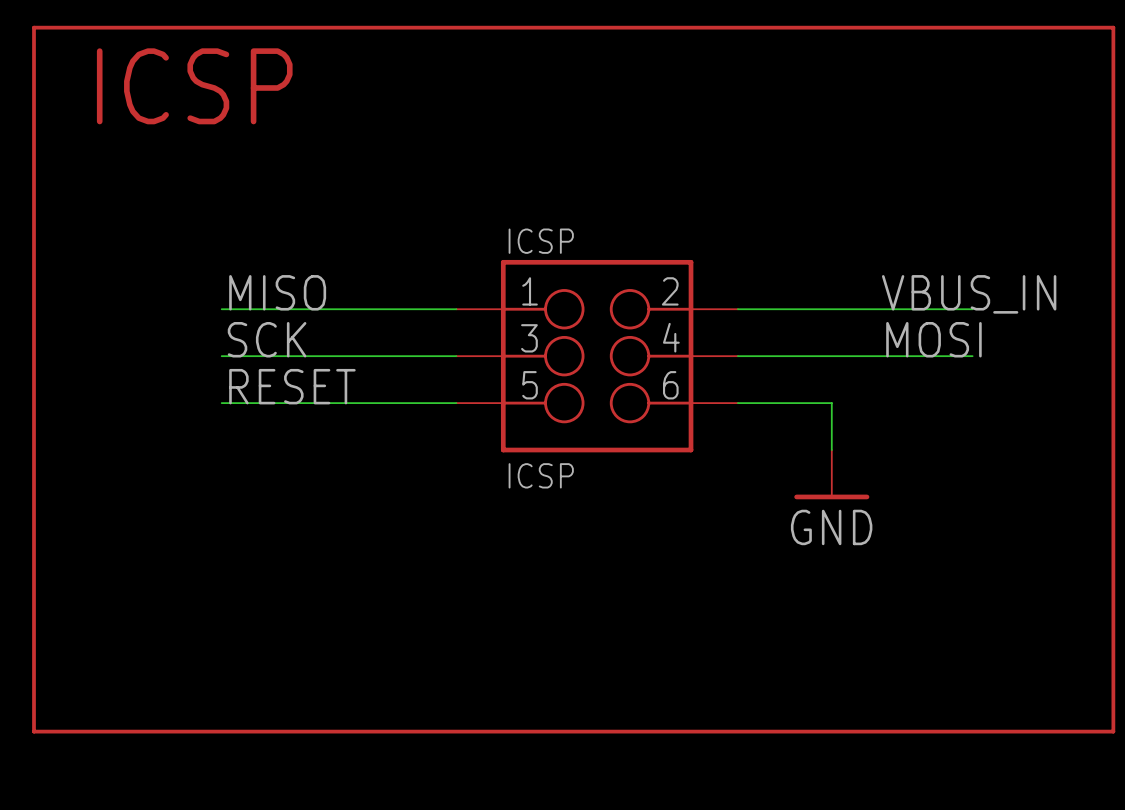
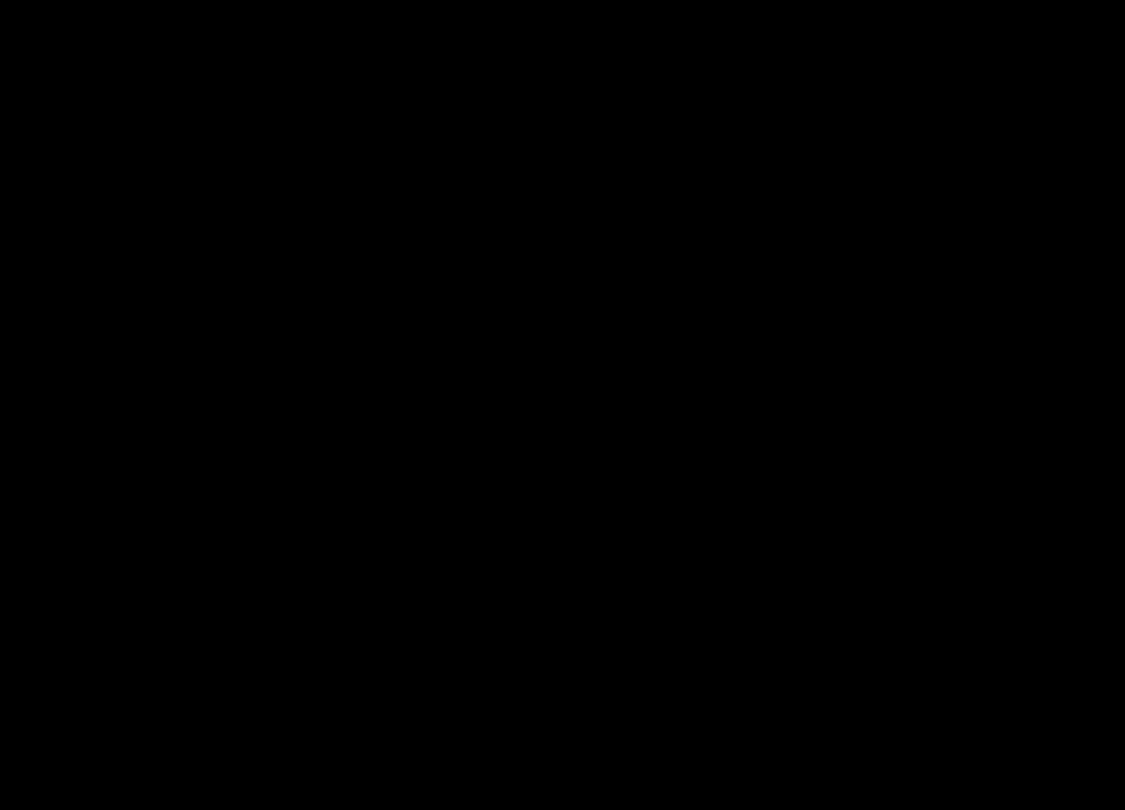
line: (33, 27) (1113, 27) (1113, 731) (33, 731) (33, 27) -> none
text: ICSP (194, 86) -> none
label: MISO (277, 292) -> none
label: VBUS_IN (969, 294) -> none
wire: (221, 309) (456, 309) -> none
wire: (737, 309) (972, 309) -> none
label: SCK (267, 339) -> none
label: MOSI (933, 339) -> none
wire: (221, 356) (456, 356) -> none
ICSP: ICSP (597, 356) -> none
wire: (737, 356) (972, 356) -> none
label: RESET (292, 386) -> none
wire: (221, 403) (456, 403) -> none
wire: (737, 403) (831, 403) (831, 450) -> none
power symbol: GND (831, 474) -> none

